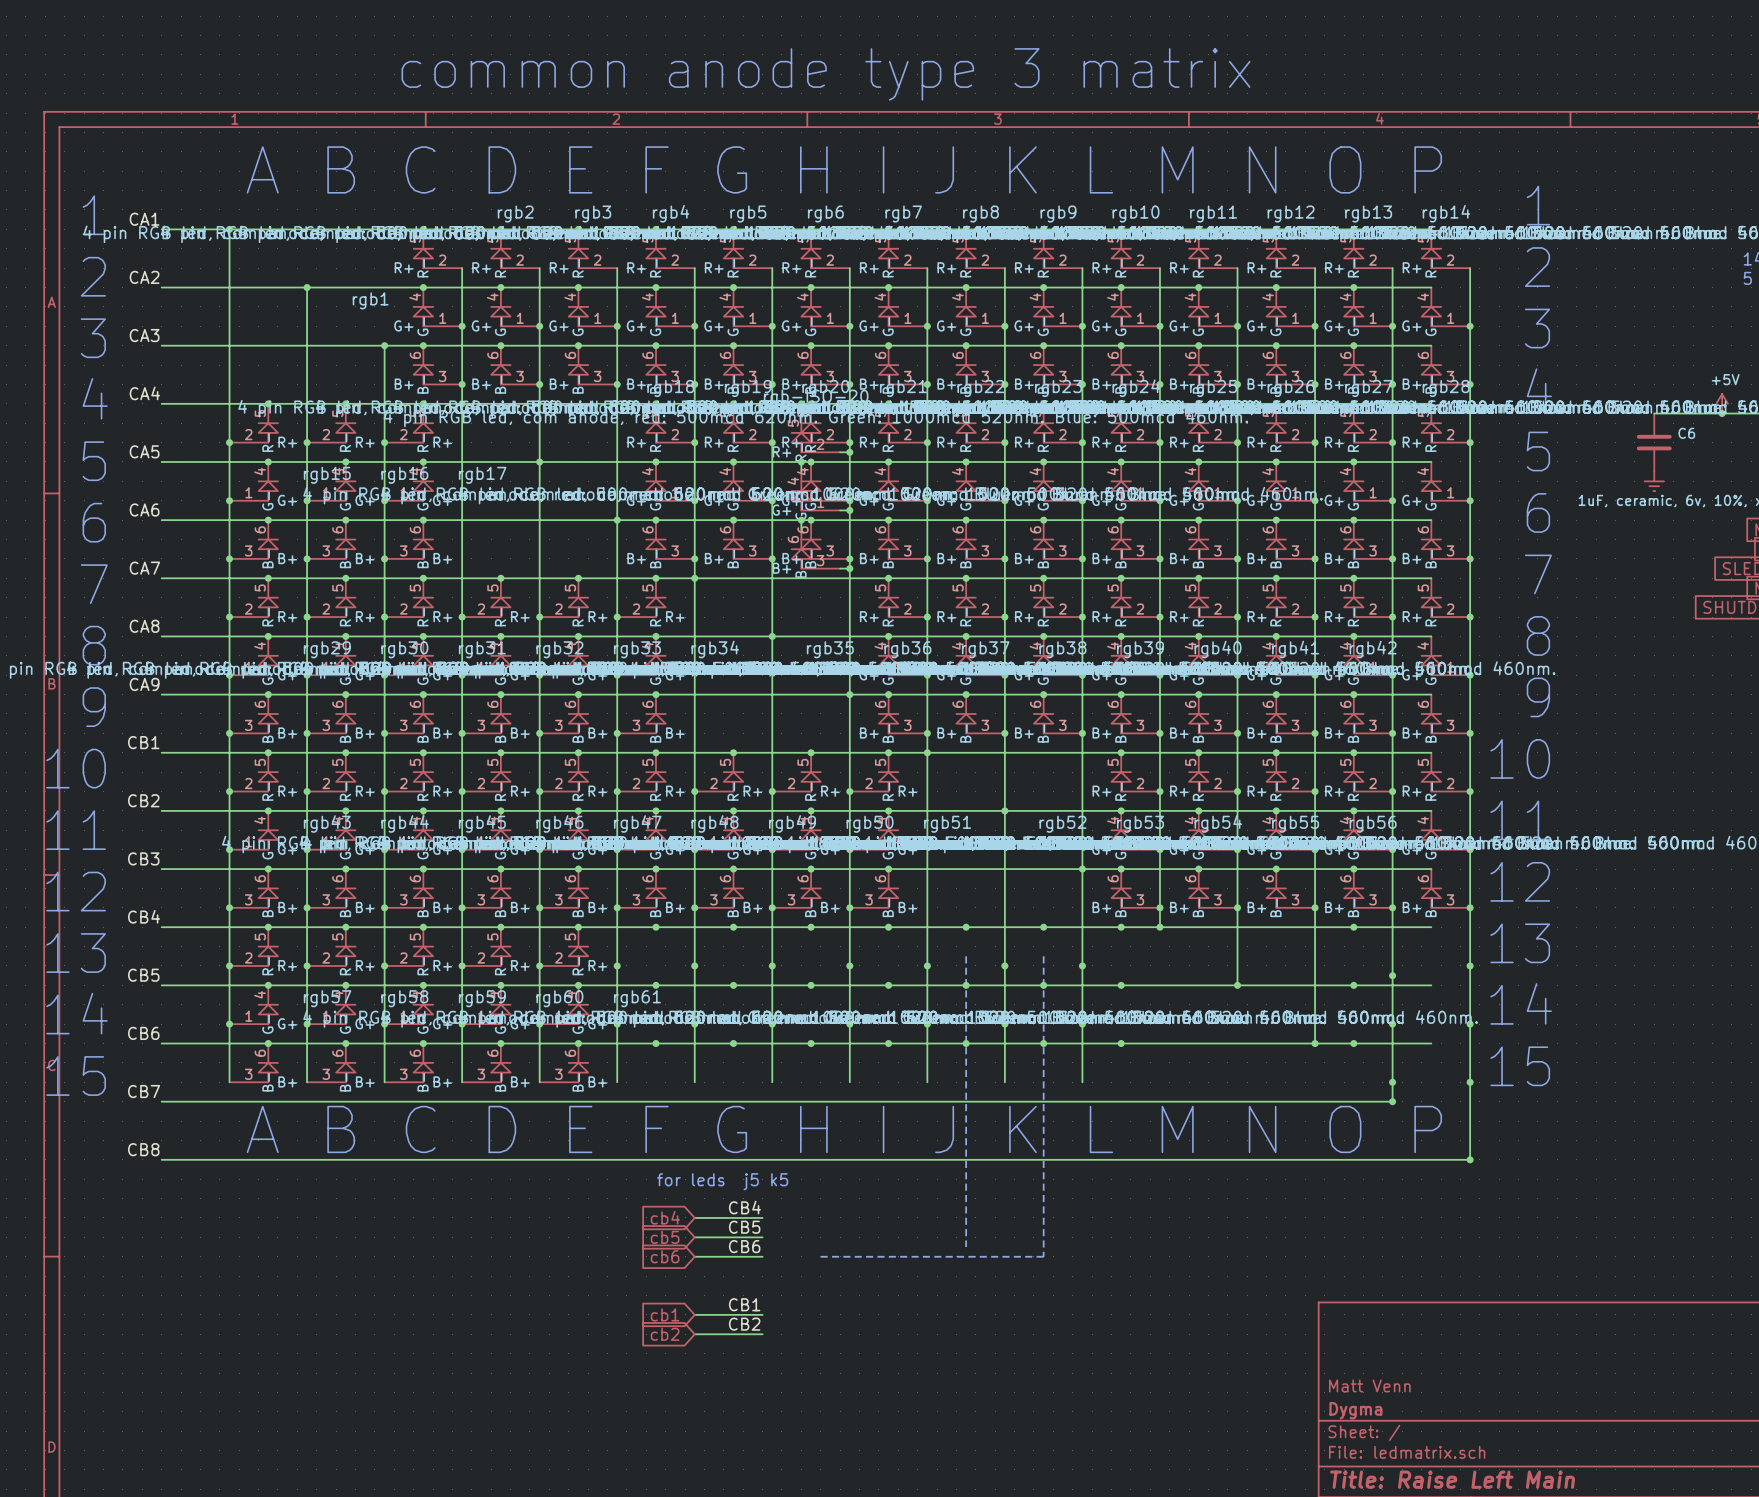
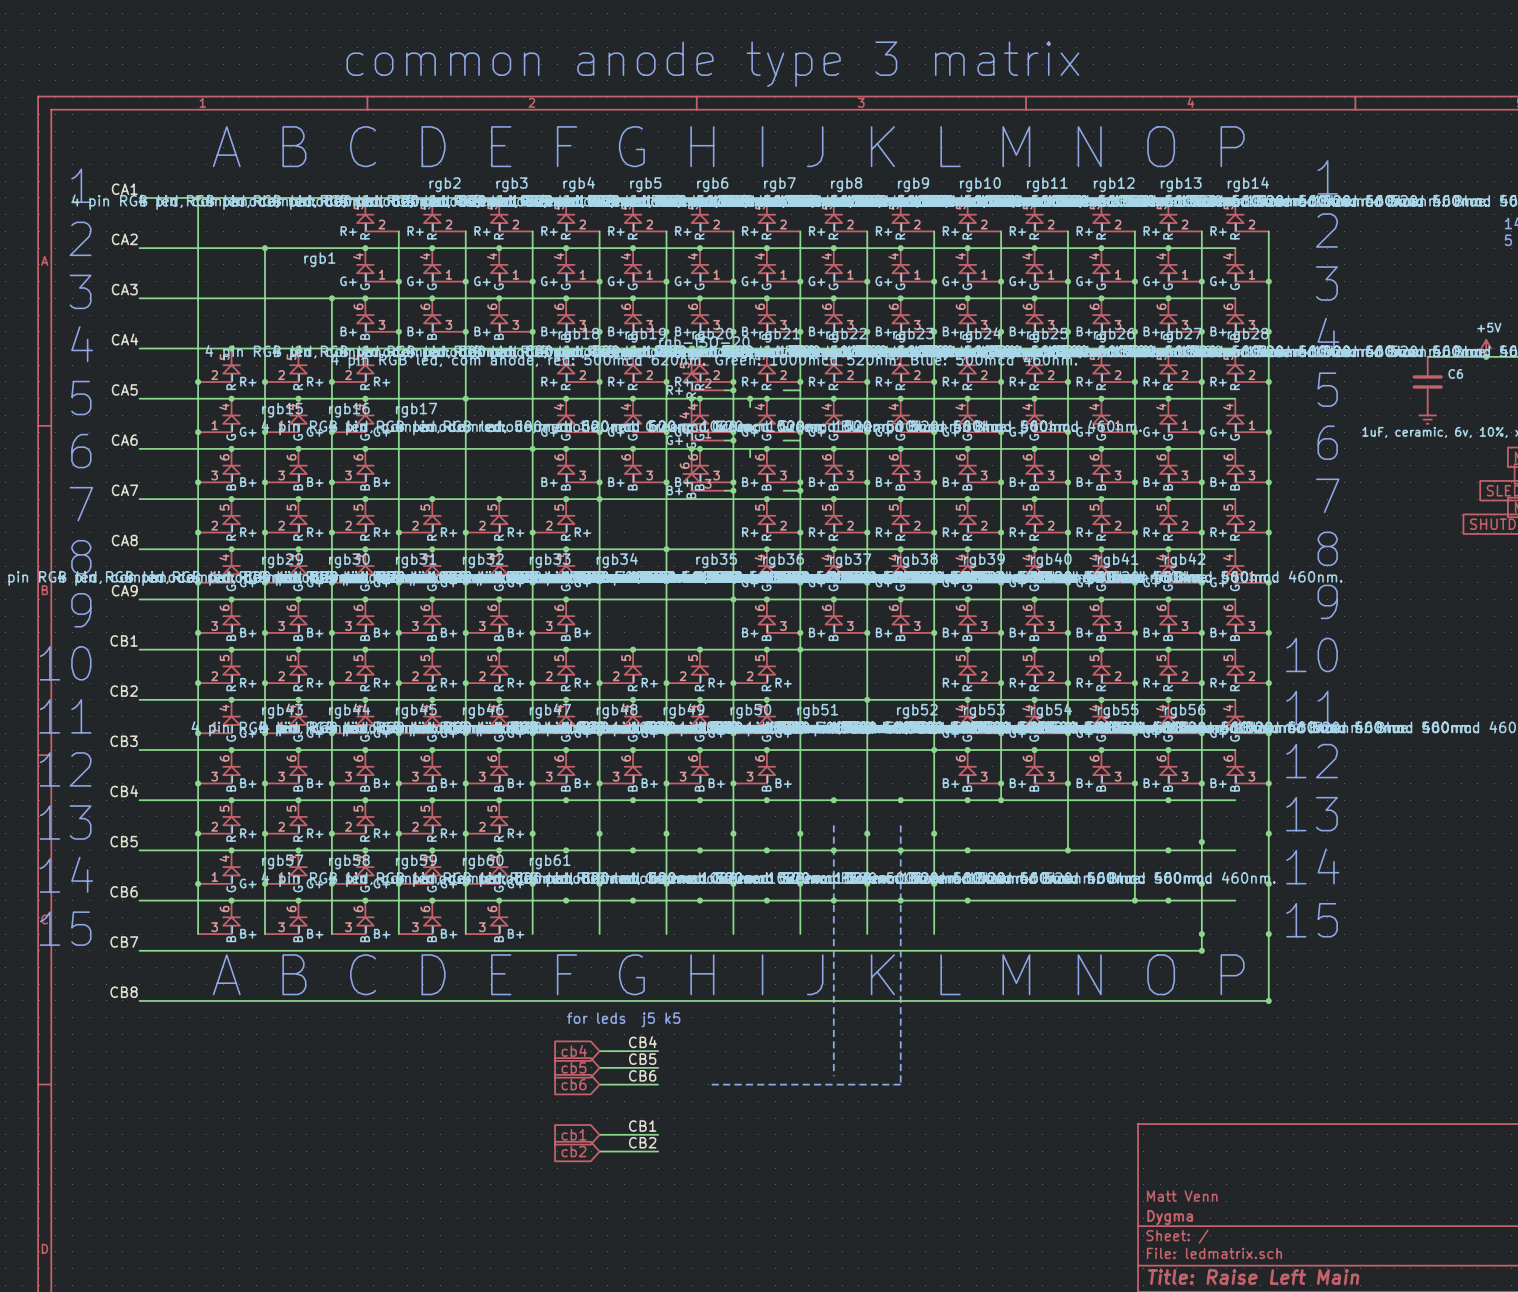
wire: none -> (783, 390) (800, 390)
wire: none -> (750, 398) (750, 407)
junction: none -> (750, 398)
wire: none -> (783, 440) (800, 440)
wire: none -> (750, 448) (750, 457)
wire: none -> (783, 490) (800, 490)
junction: none -> (800, 490)

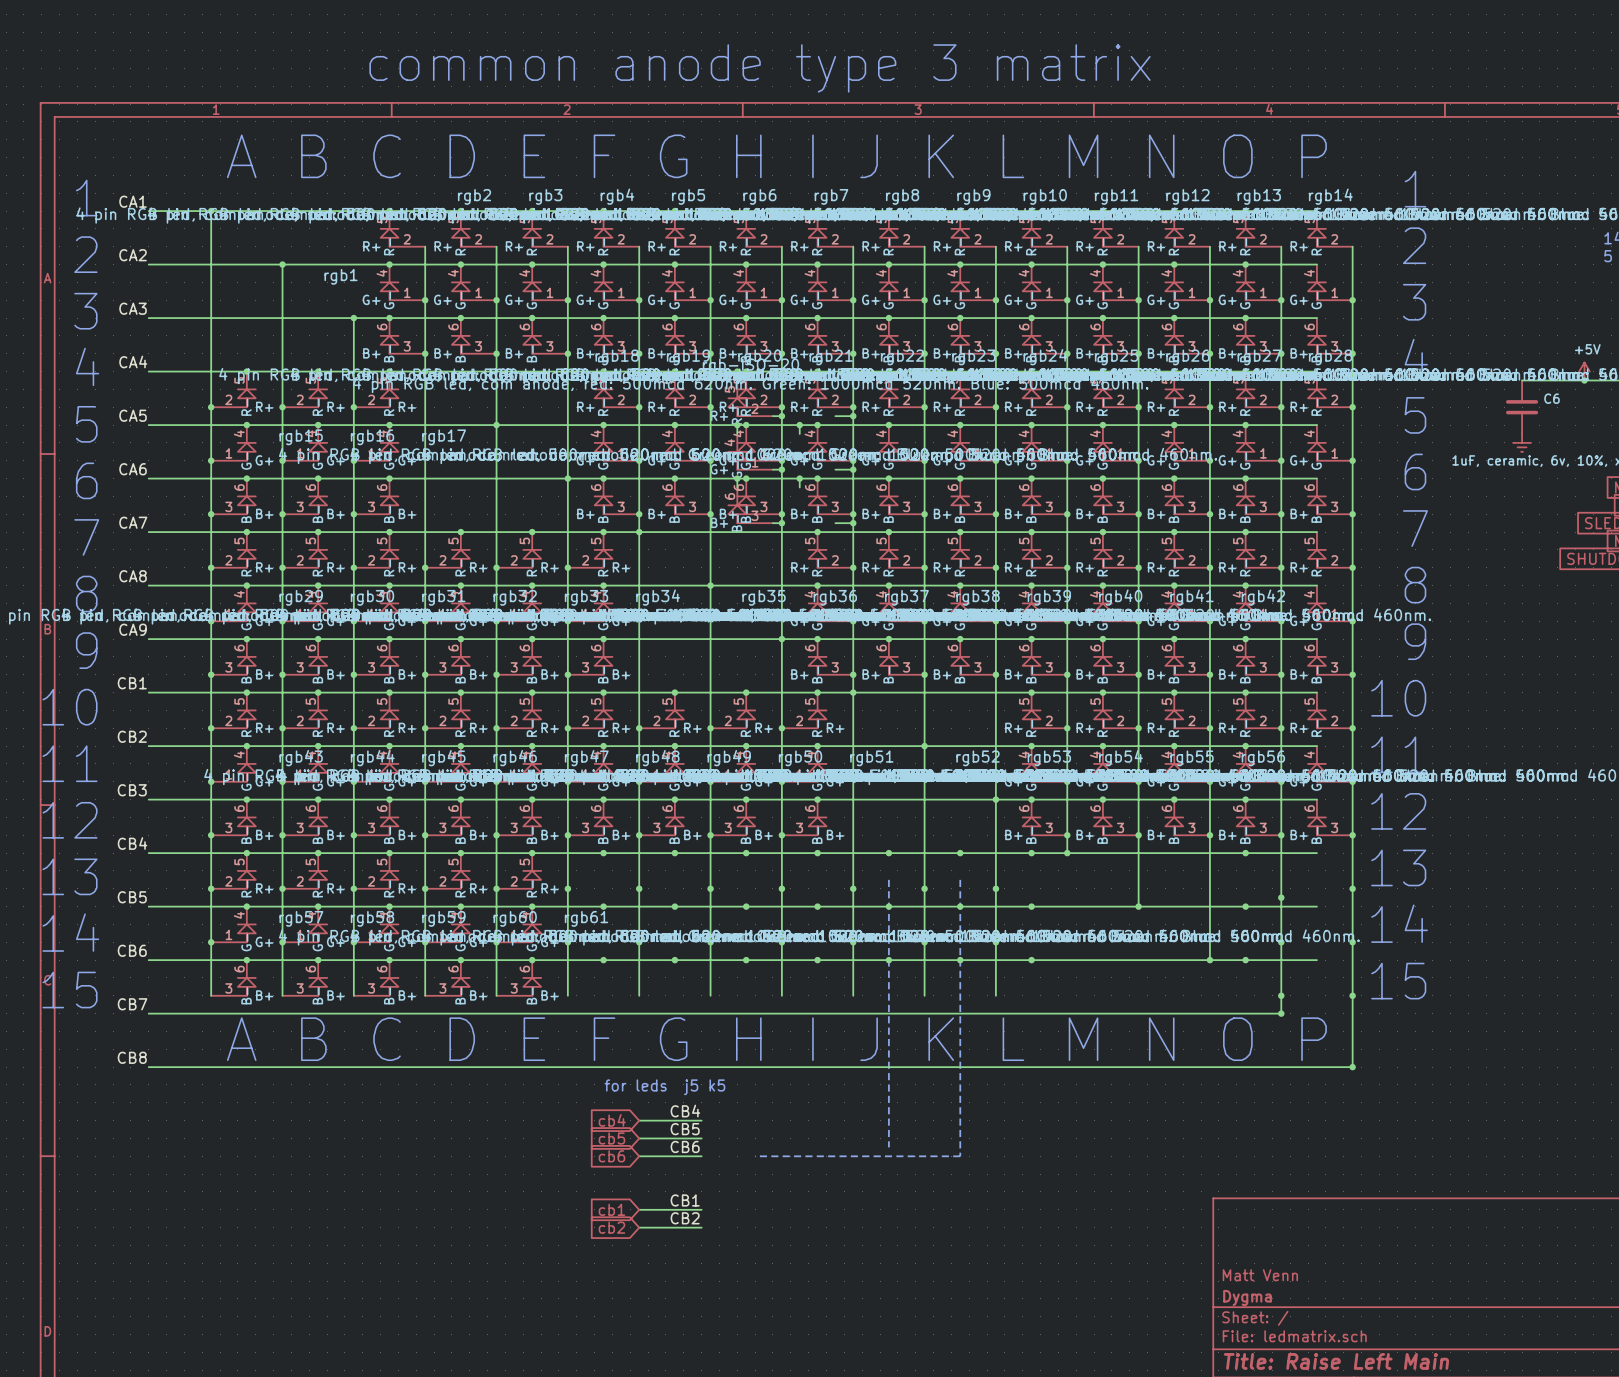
junction: none -> (853, 416)
junction: none -> (853, 469)
junction: none -> (799, 478)

